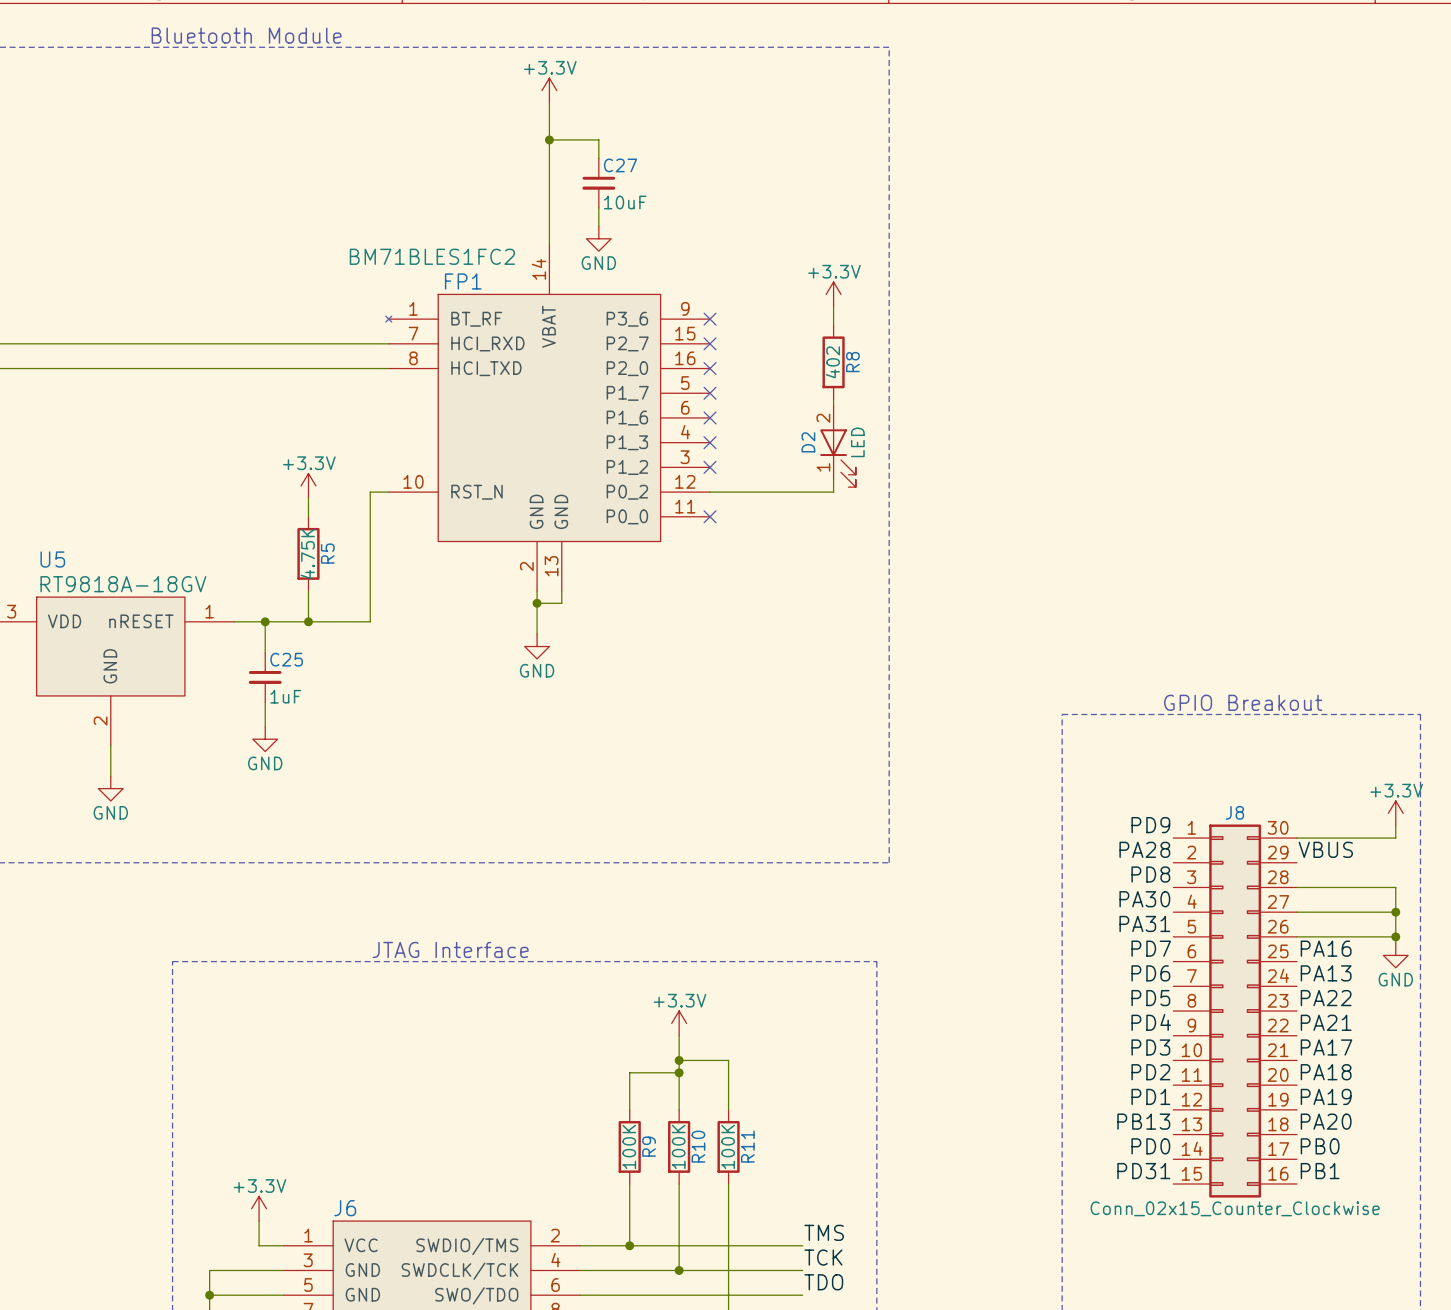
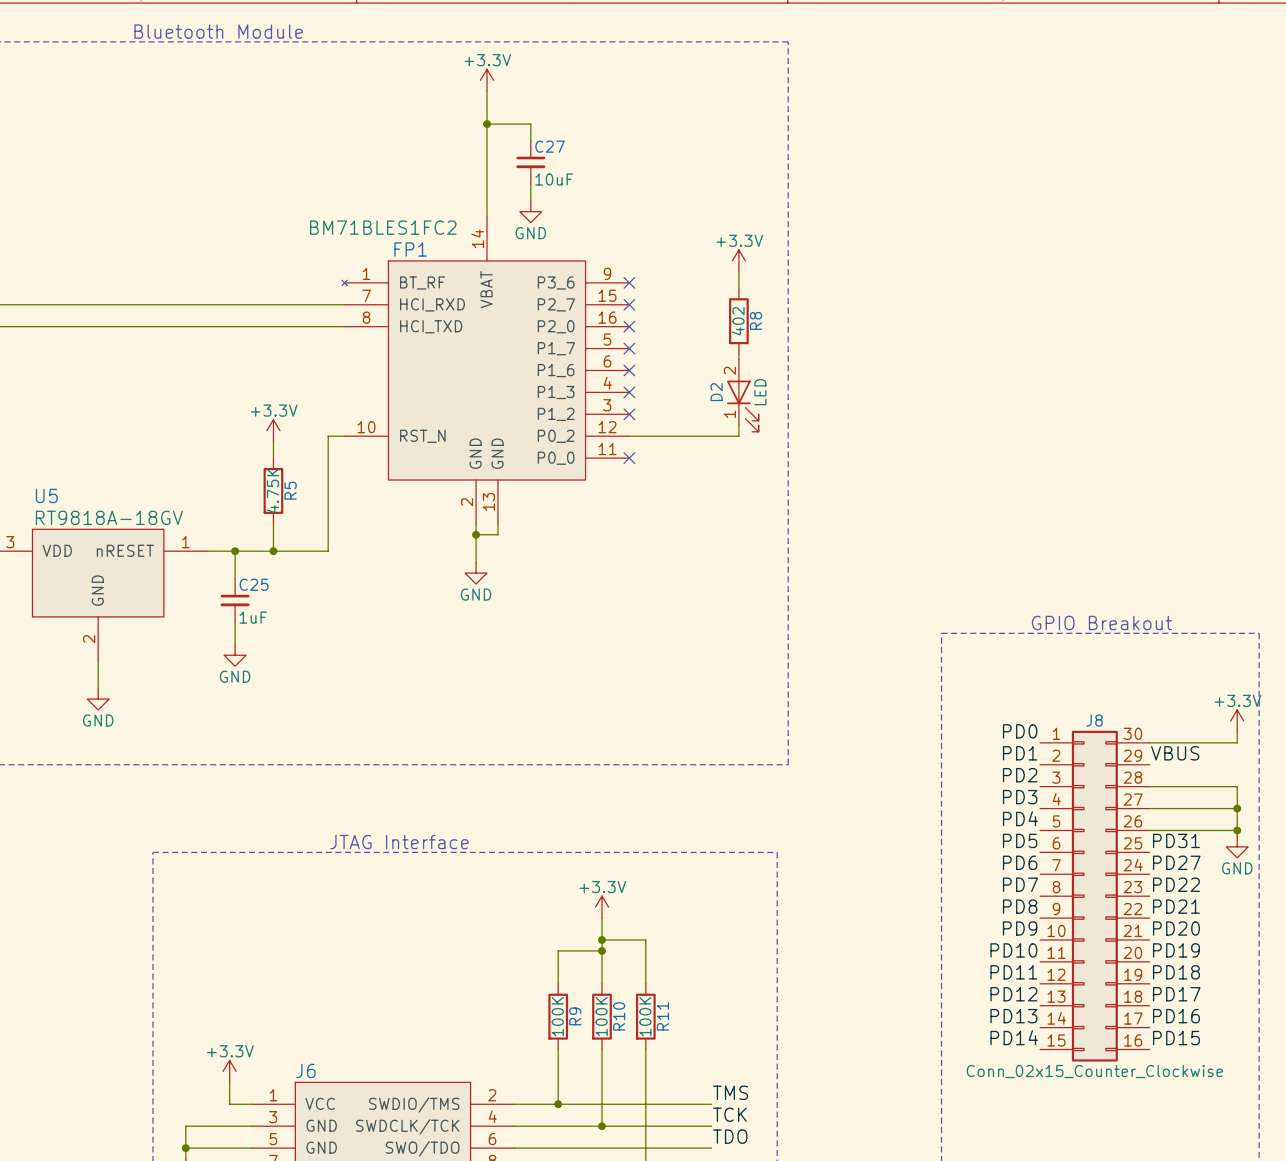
label: PD9 (1150, 825) -> PD0 (1020, 731)
label: PA28 (1144, 849) -> PD1 (1020, 753)
label: PD8 (1150, 874) -> PD2 (1020, 775)
label: PA30 (1144, 899) -> PD3 (1020, 797)
label: PA31 (1144, 923) -> PD4 (1020, 818)
label: PD7 (1151, 948) -> PD5 (1020, 840)
label: PA16 (1326, 948) -> PD31 (1176, 840)
label: PA13 (1326, 973) -> PD27 (1176, 862)
label: PD5 (1150, 998) -> PD7 (1020, 884)
label: PA22 (1326, 998) -> PD22 (1176, 884)
label: PD4 (1151, 1022) -> PD8 (1020, 906)
label: PA21 (1326, 1022) -> PD21 (1176, 906)
label: PD3 (1150, 1047) -> PD9 (1020, 928)
label: PA17 (1326, 1047) -> PD20 (1176, 928)
label: PD2 (1150, 1072) -> PD10 (1013, 950)
label: PA18 (1326, 1072) -> PD19 (1176, 950)
label: PD1 (1150, 1096) -> PD11 (1013, 972)
label: PA19 (1326, 1096) -> PD18 (1176, 972)
label: PB13 (1143, 1121) -> PD12 (1013, 994)
label: PA20 (1326, 1121) -> PD17 (1176, 994)
label: PD0 (1150, 1146) -> PD13 (1013, 1016)
label: PB0 (1320, 1146) -> PD16 (1176, 1016)
label: PD31 (1143, 1171) -> PD14 (1014, 1037)
label: PB1 (1320, 1171) -> PD15 (1176, 1038)

